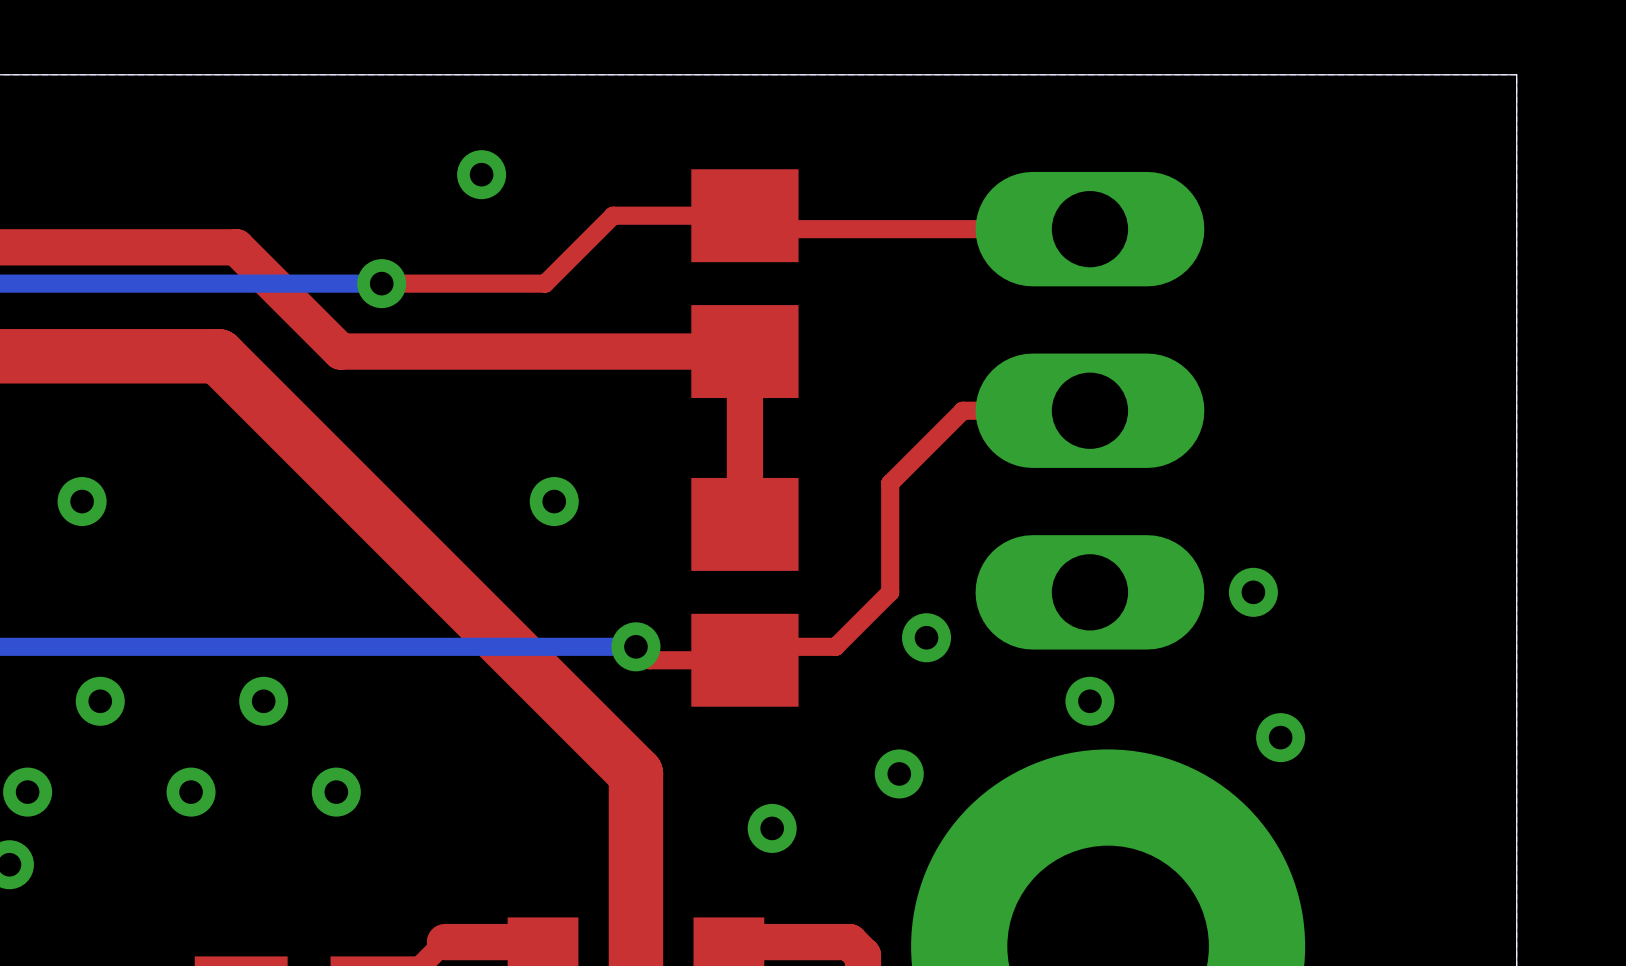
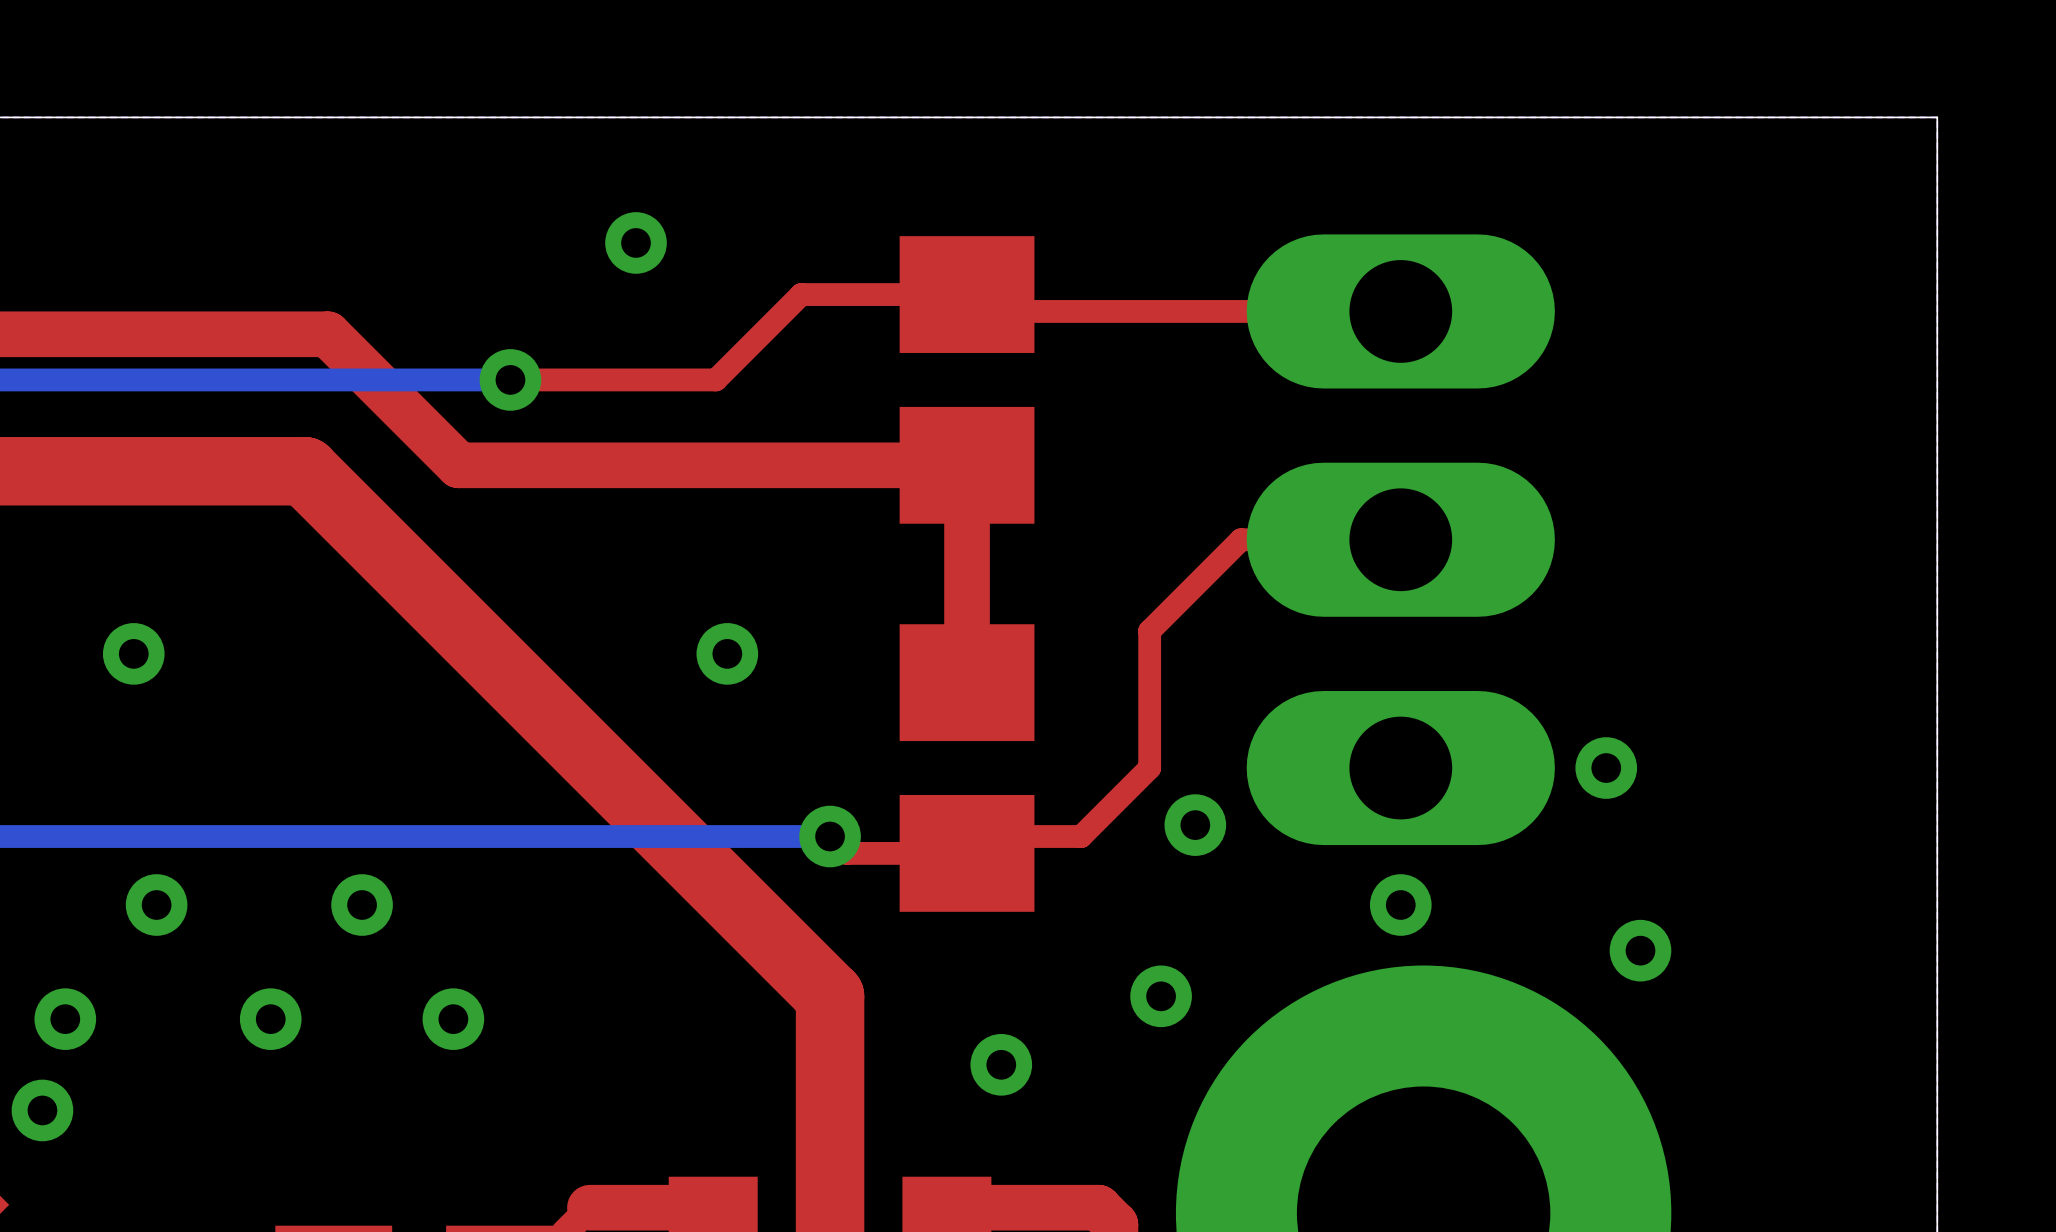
part footprint: [975, 171, 1205, 650] -> [1246, 234, 1555, 846]

